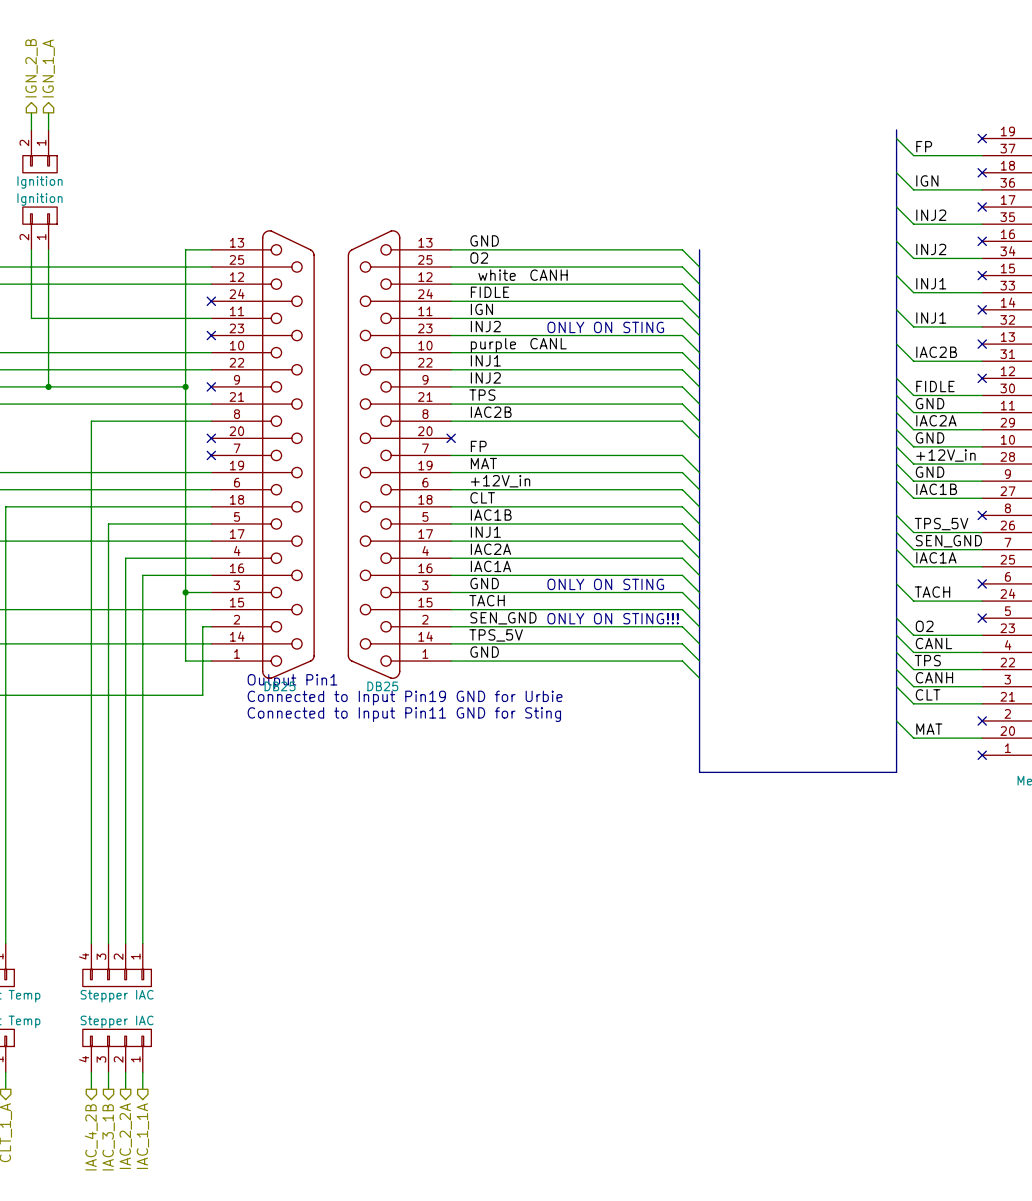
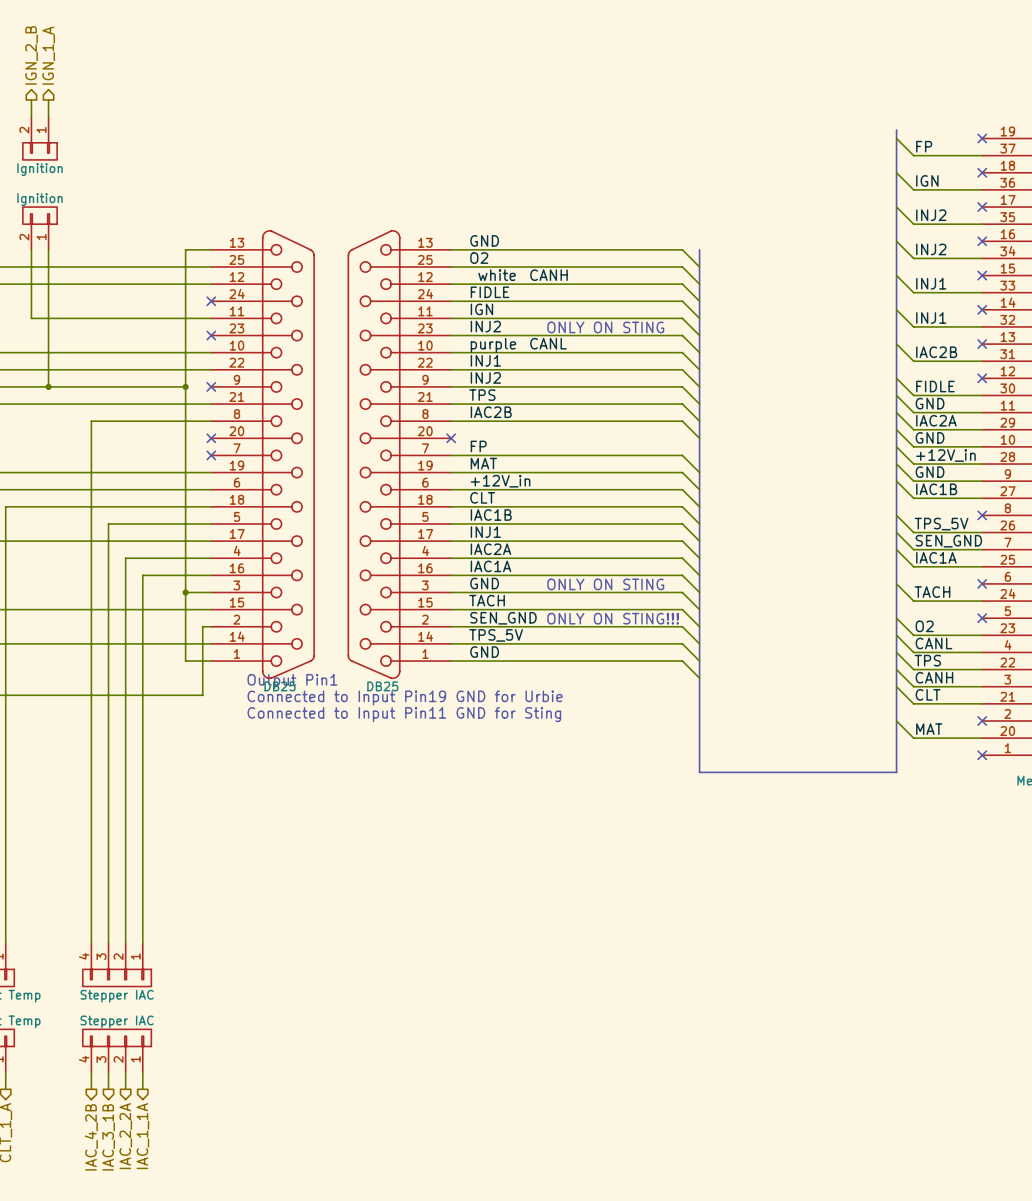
hierarchical label position: IGN_2_B (31, 68) -> IGN_2_B (31, 55)
hierarchical label position: IGN_1_A (48, 68) -> IGN_1_A (48, 55)
part position: (40, 151) -> (40, 138)

